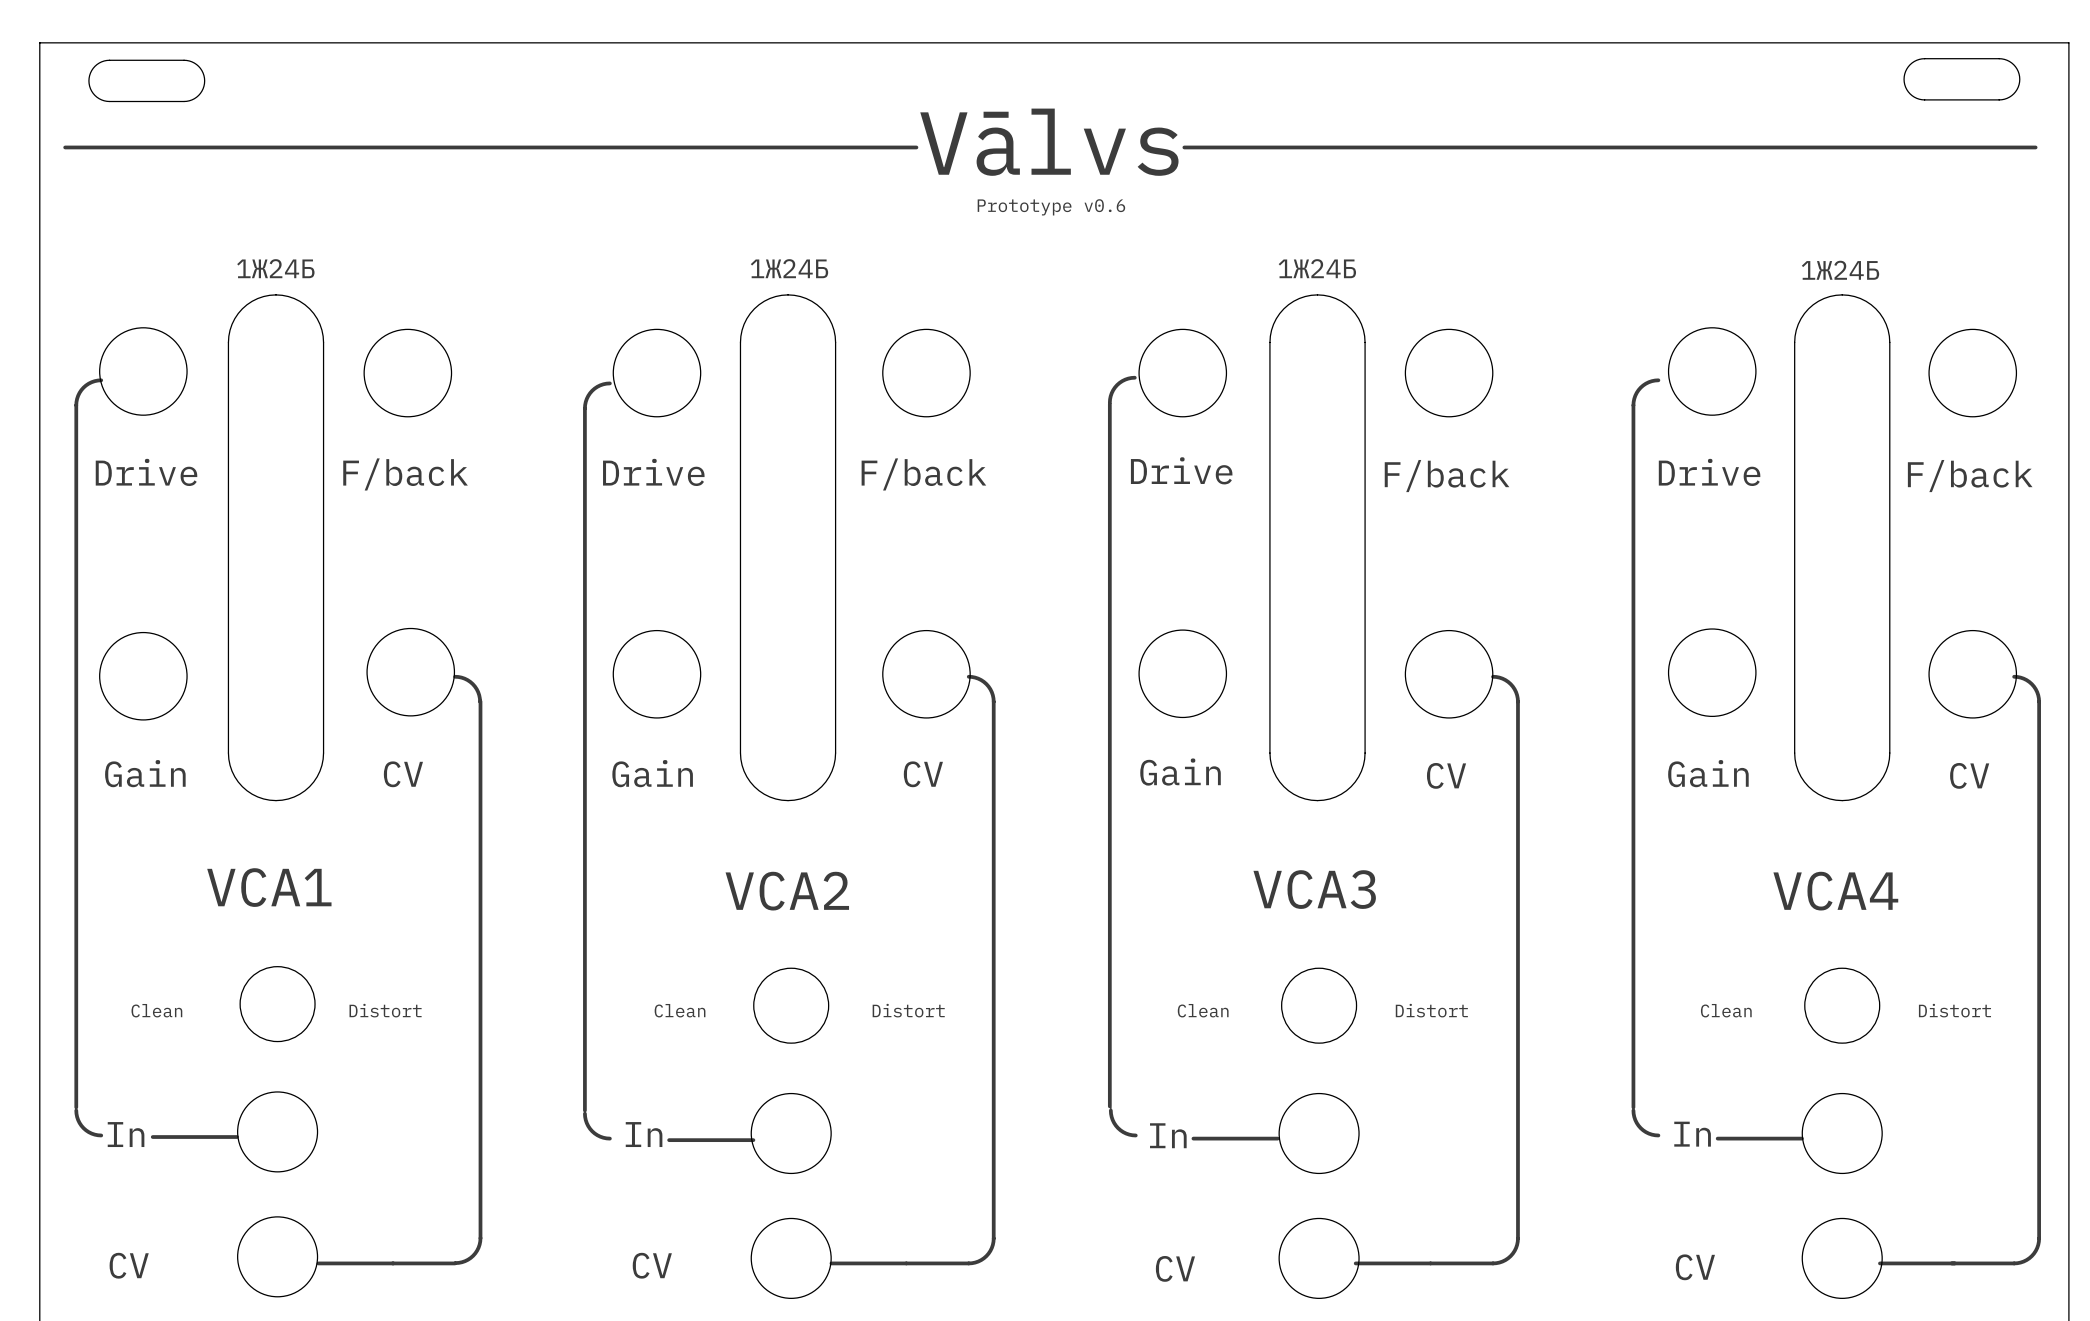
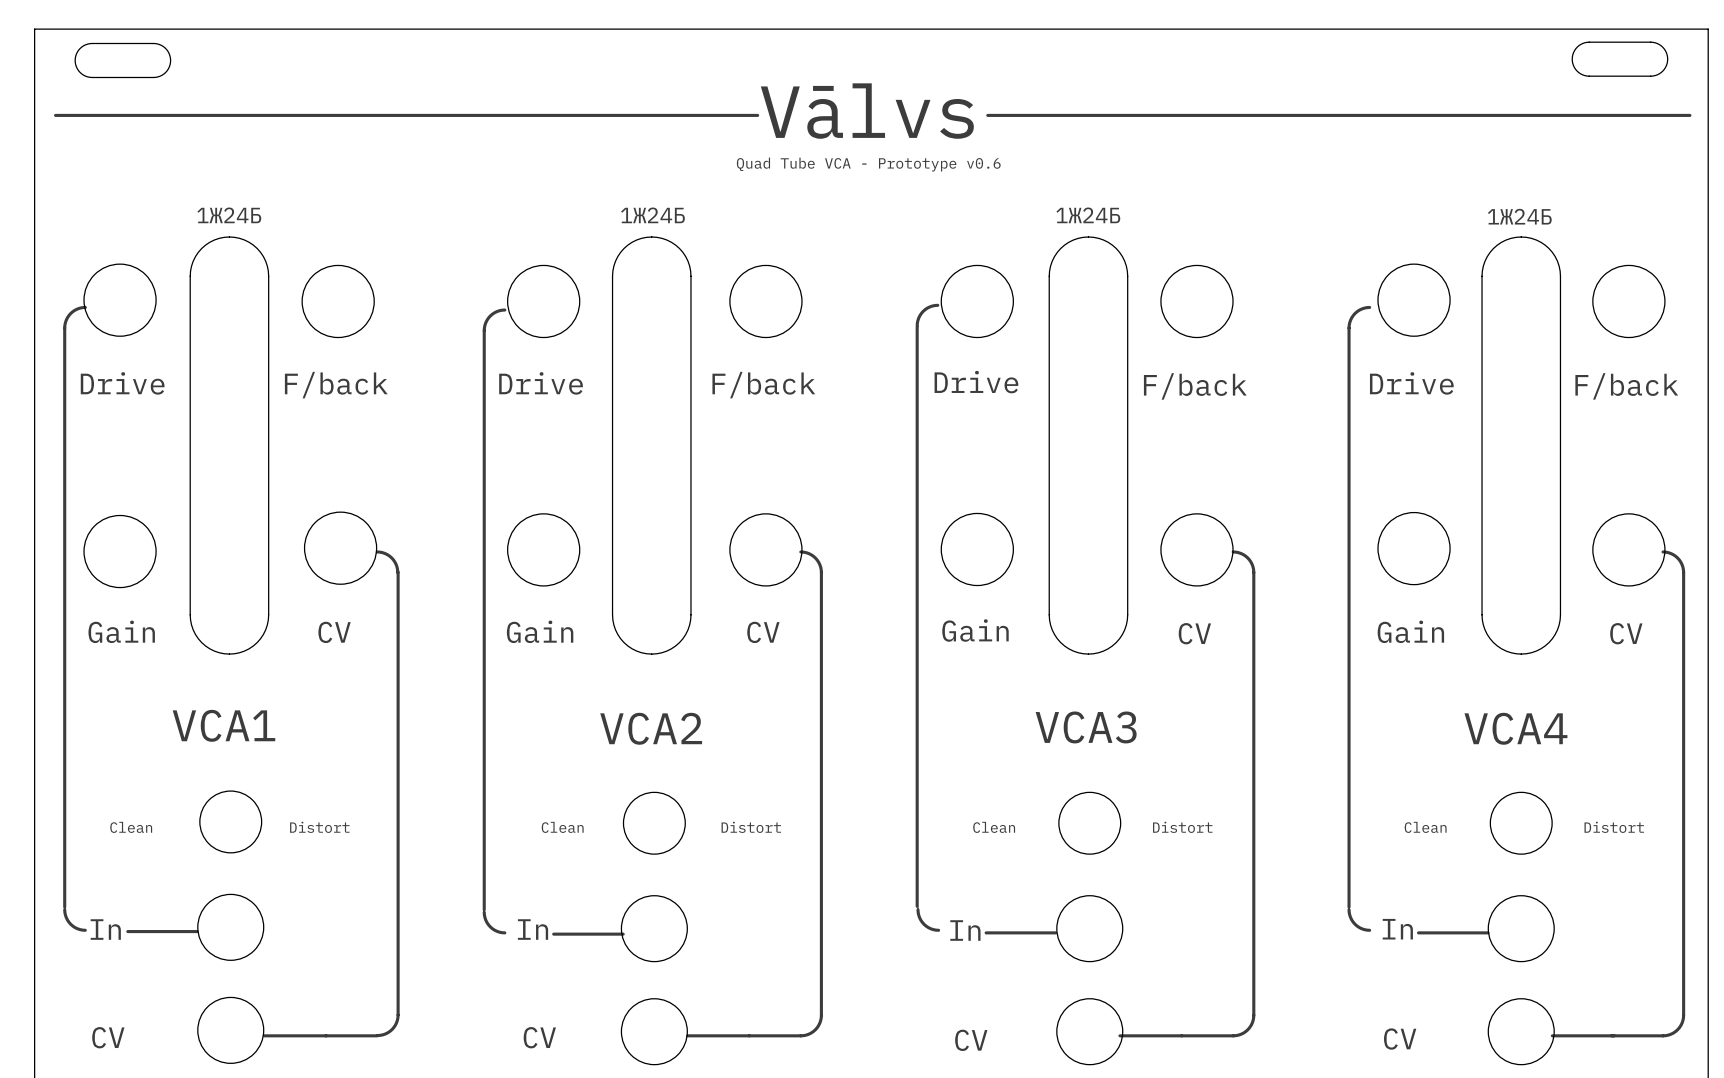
line: (1184, 147) (1195, 147) -> none
line: none -> (1680, 115) (1689, 115)
text: Prototype v0.6 (1051, 207) -> Quad Tube VCA - Prototype v0.6 (868, 164)

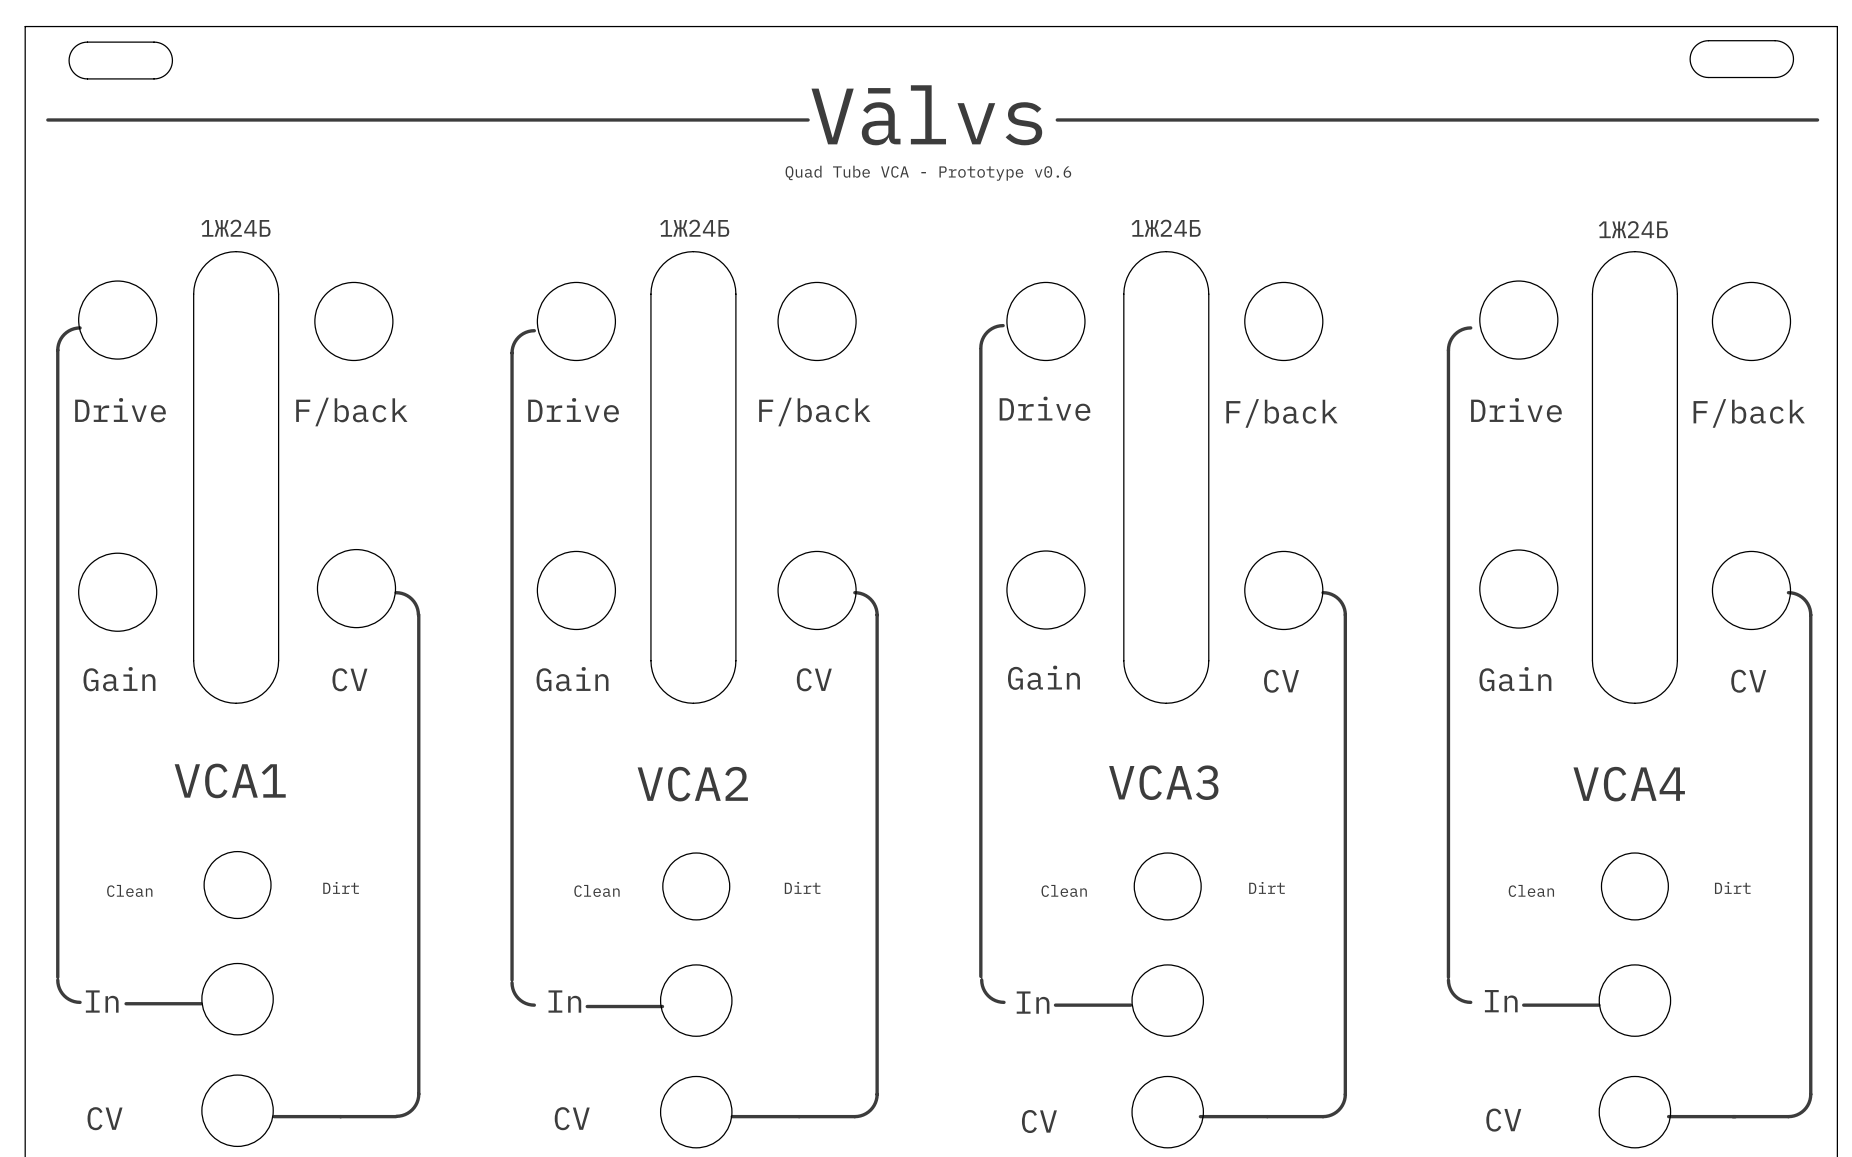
text: Distort (319, 827) -> Dirt (341, 887)
text: Distort (751, 827) -> Dirt (802, 887)
text: Distort (1182, 827) -> Dirt (1266, 887)
text: Distort (1614, 827) -> Dirt (1732, 887)

